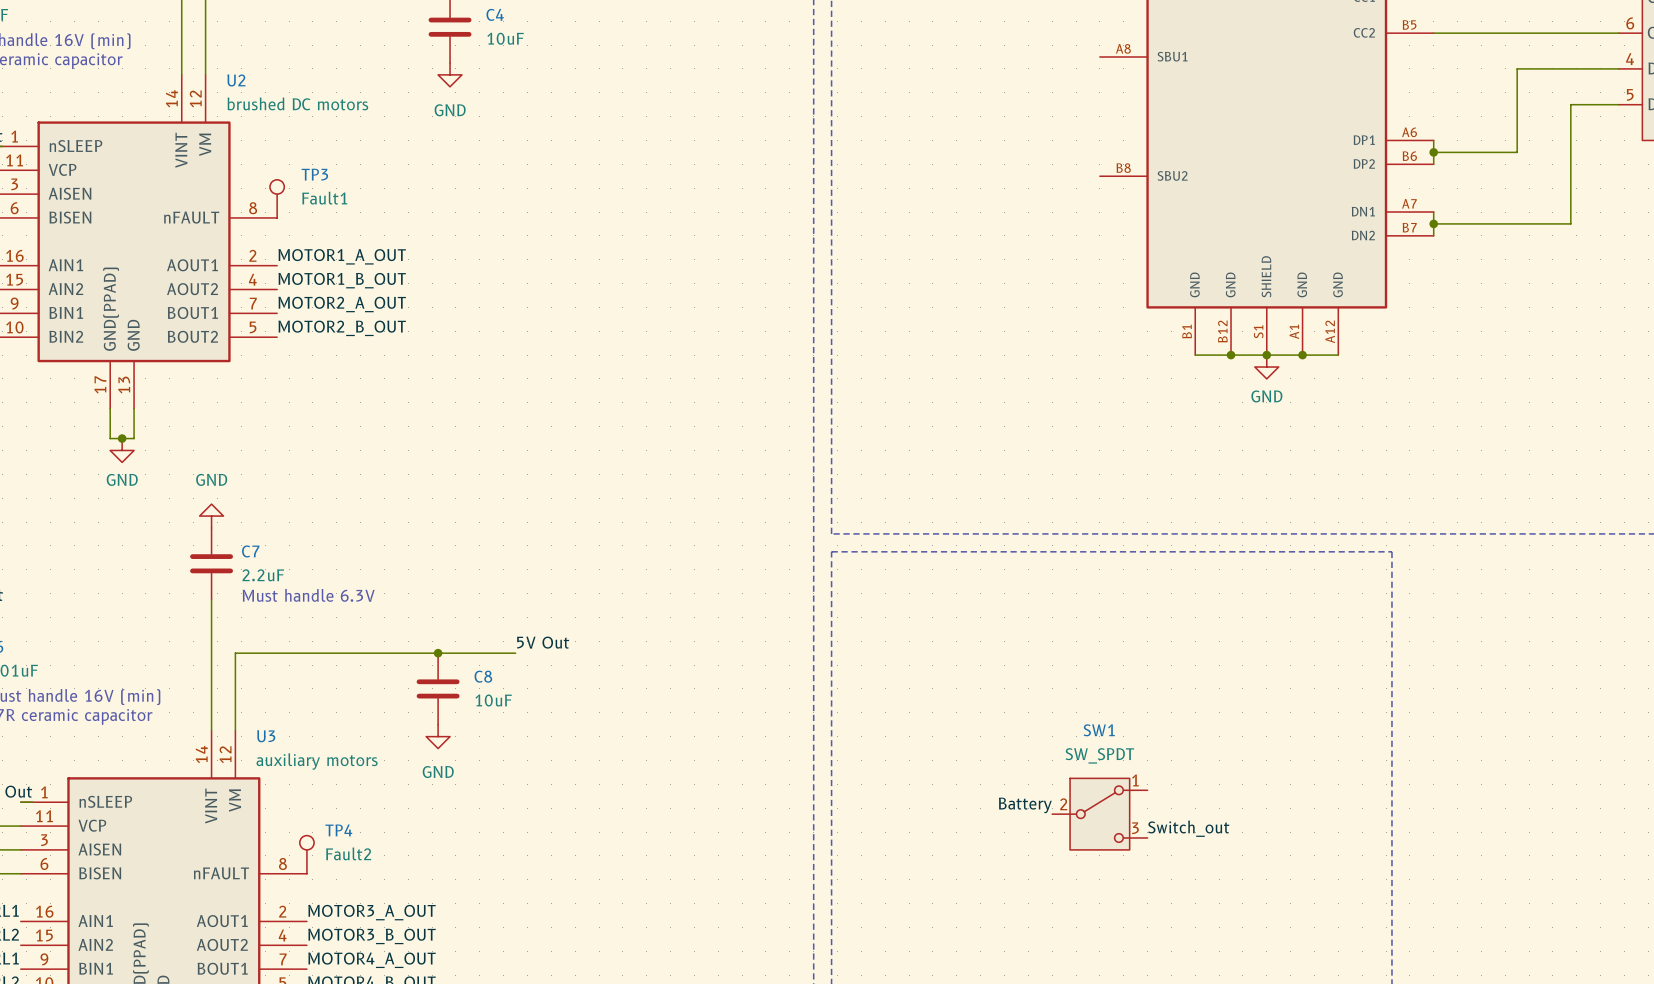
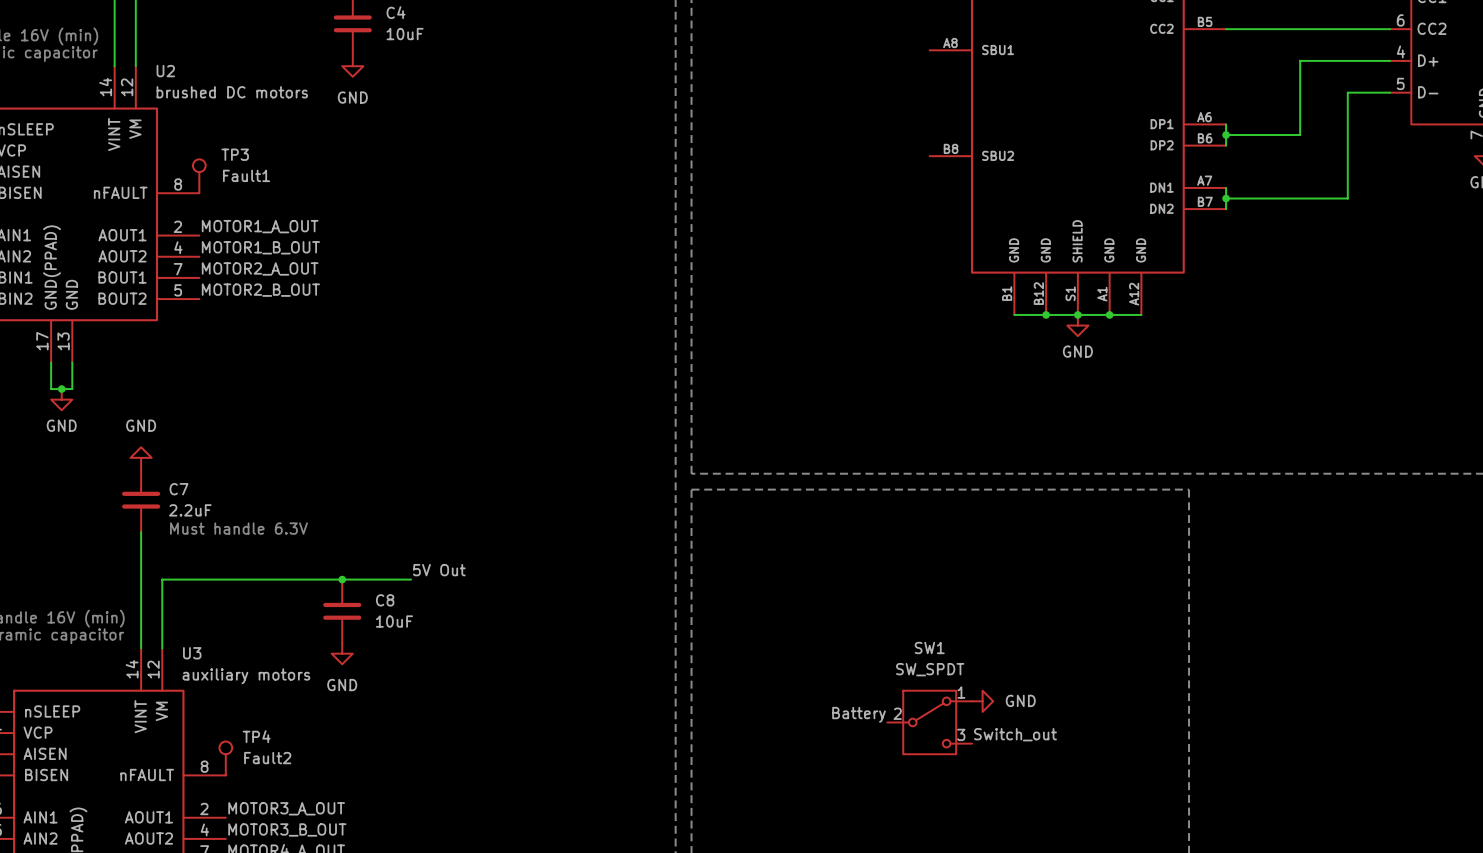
power symbol: none -> GND (982, 701)

